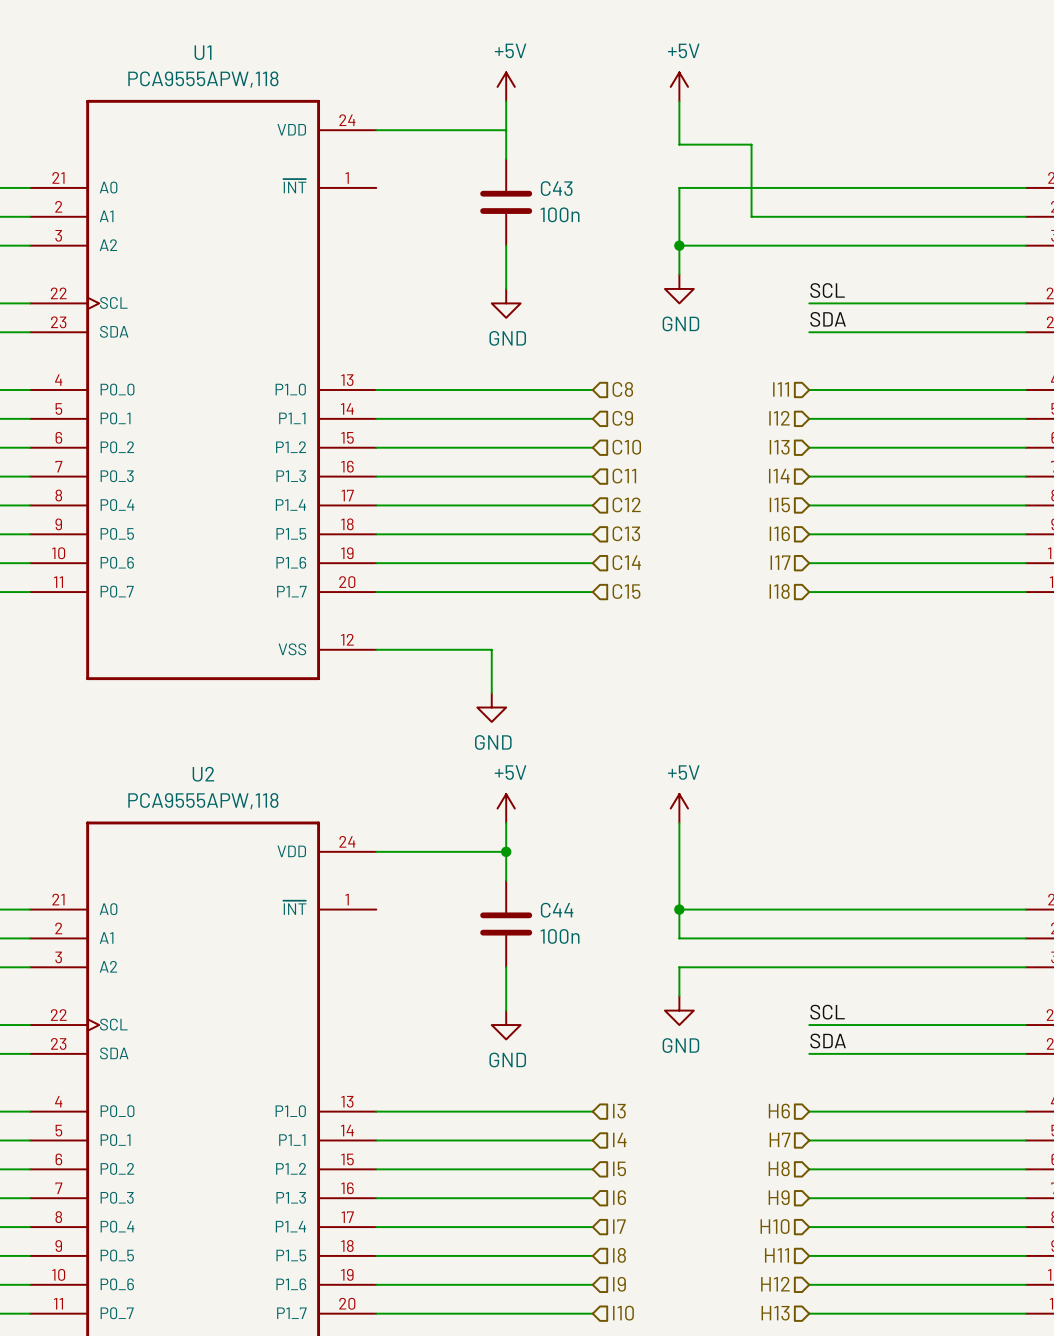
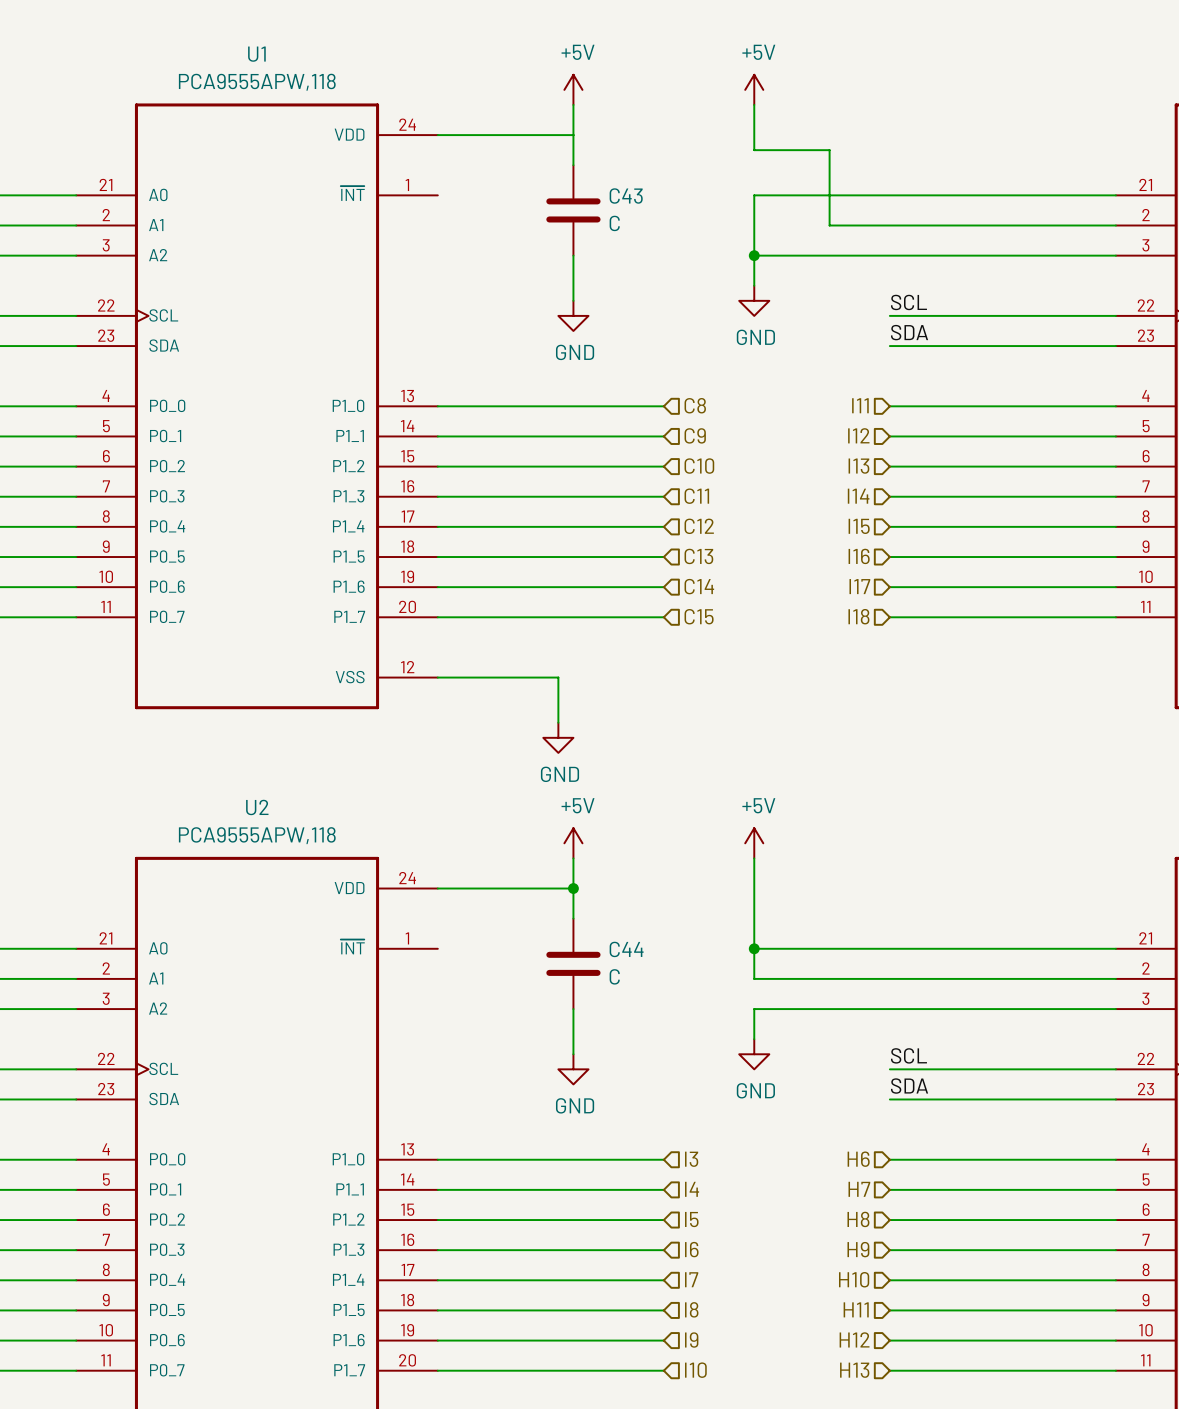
C43 value: 100n (560, 214) -> C (614, 223)
C44 value: 100n (560, 936) -> C (614, 976)

